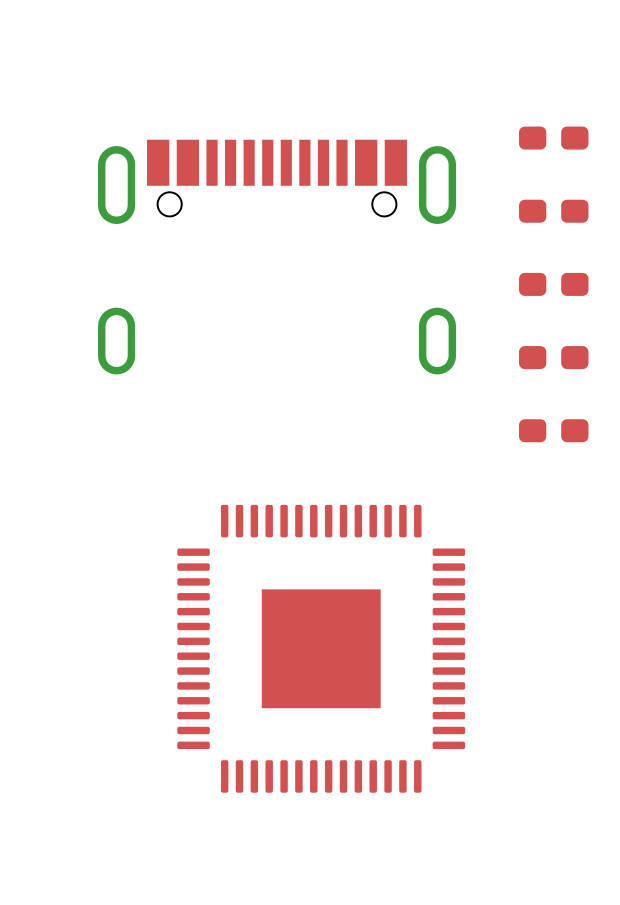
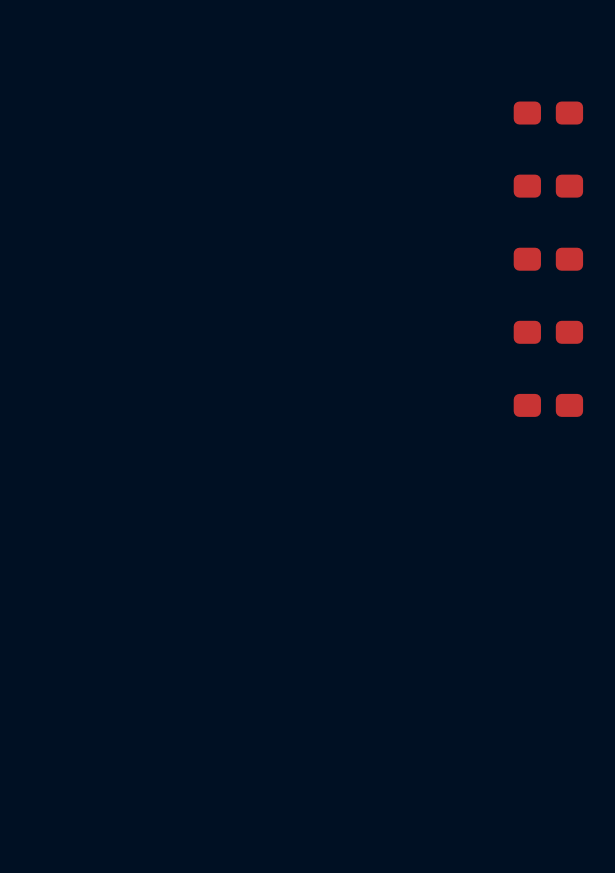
part: (277, 257) -> none
part: (321, 648) -> none

